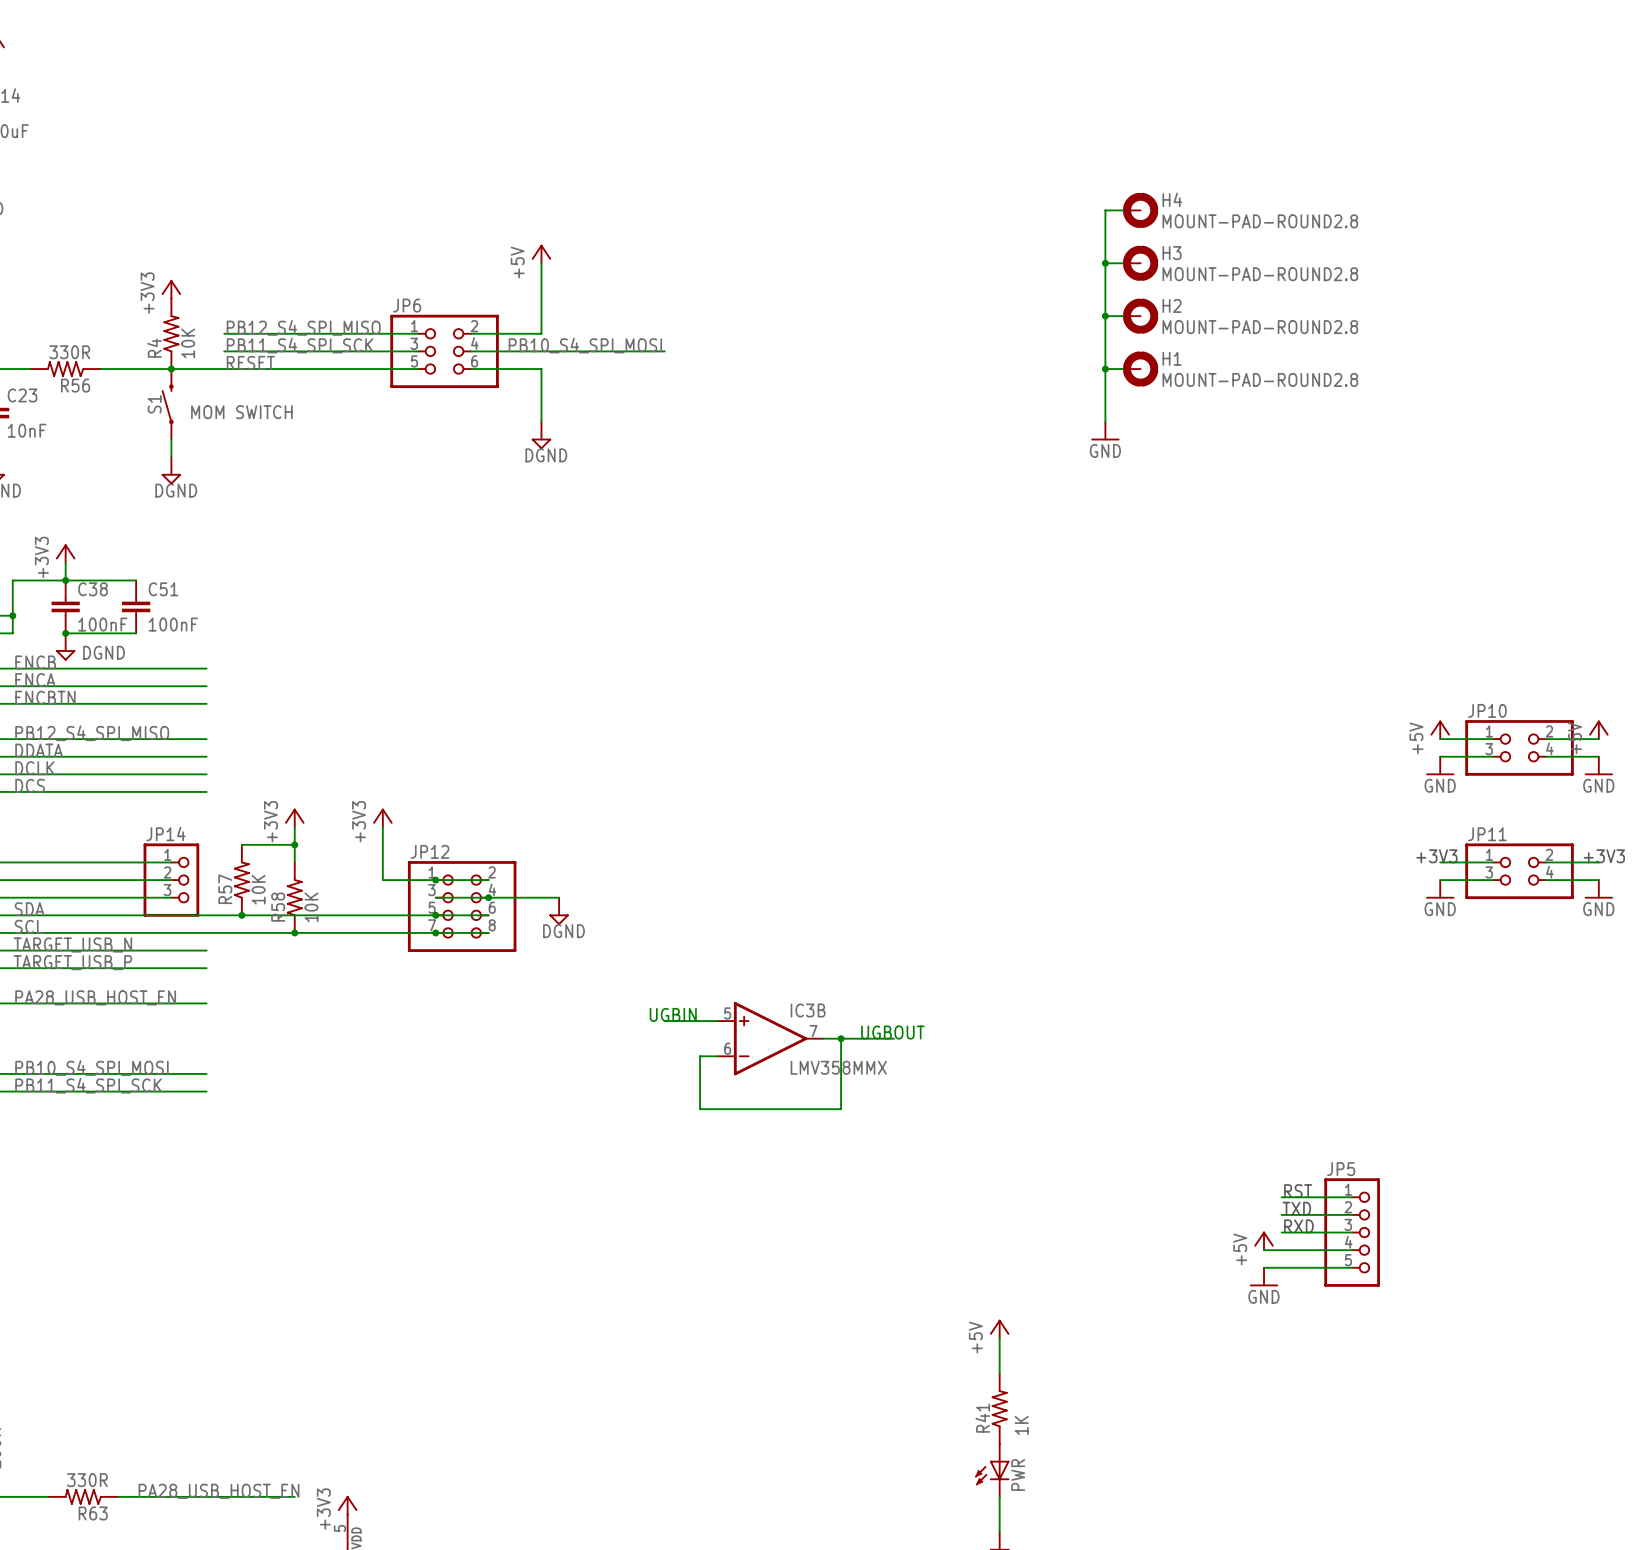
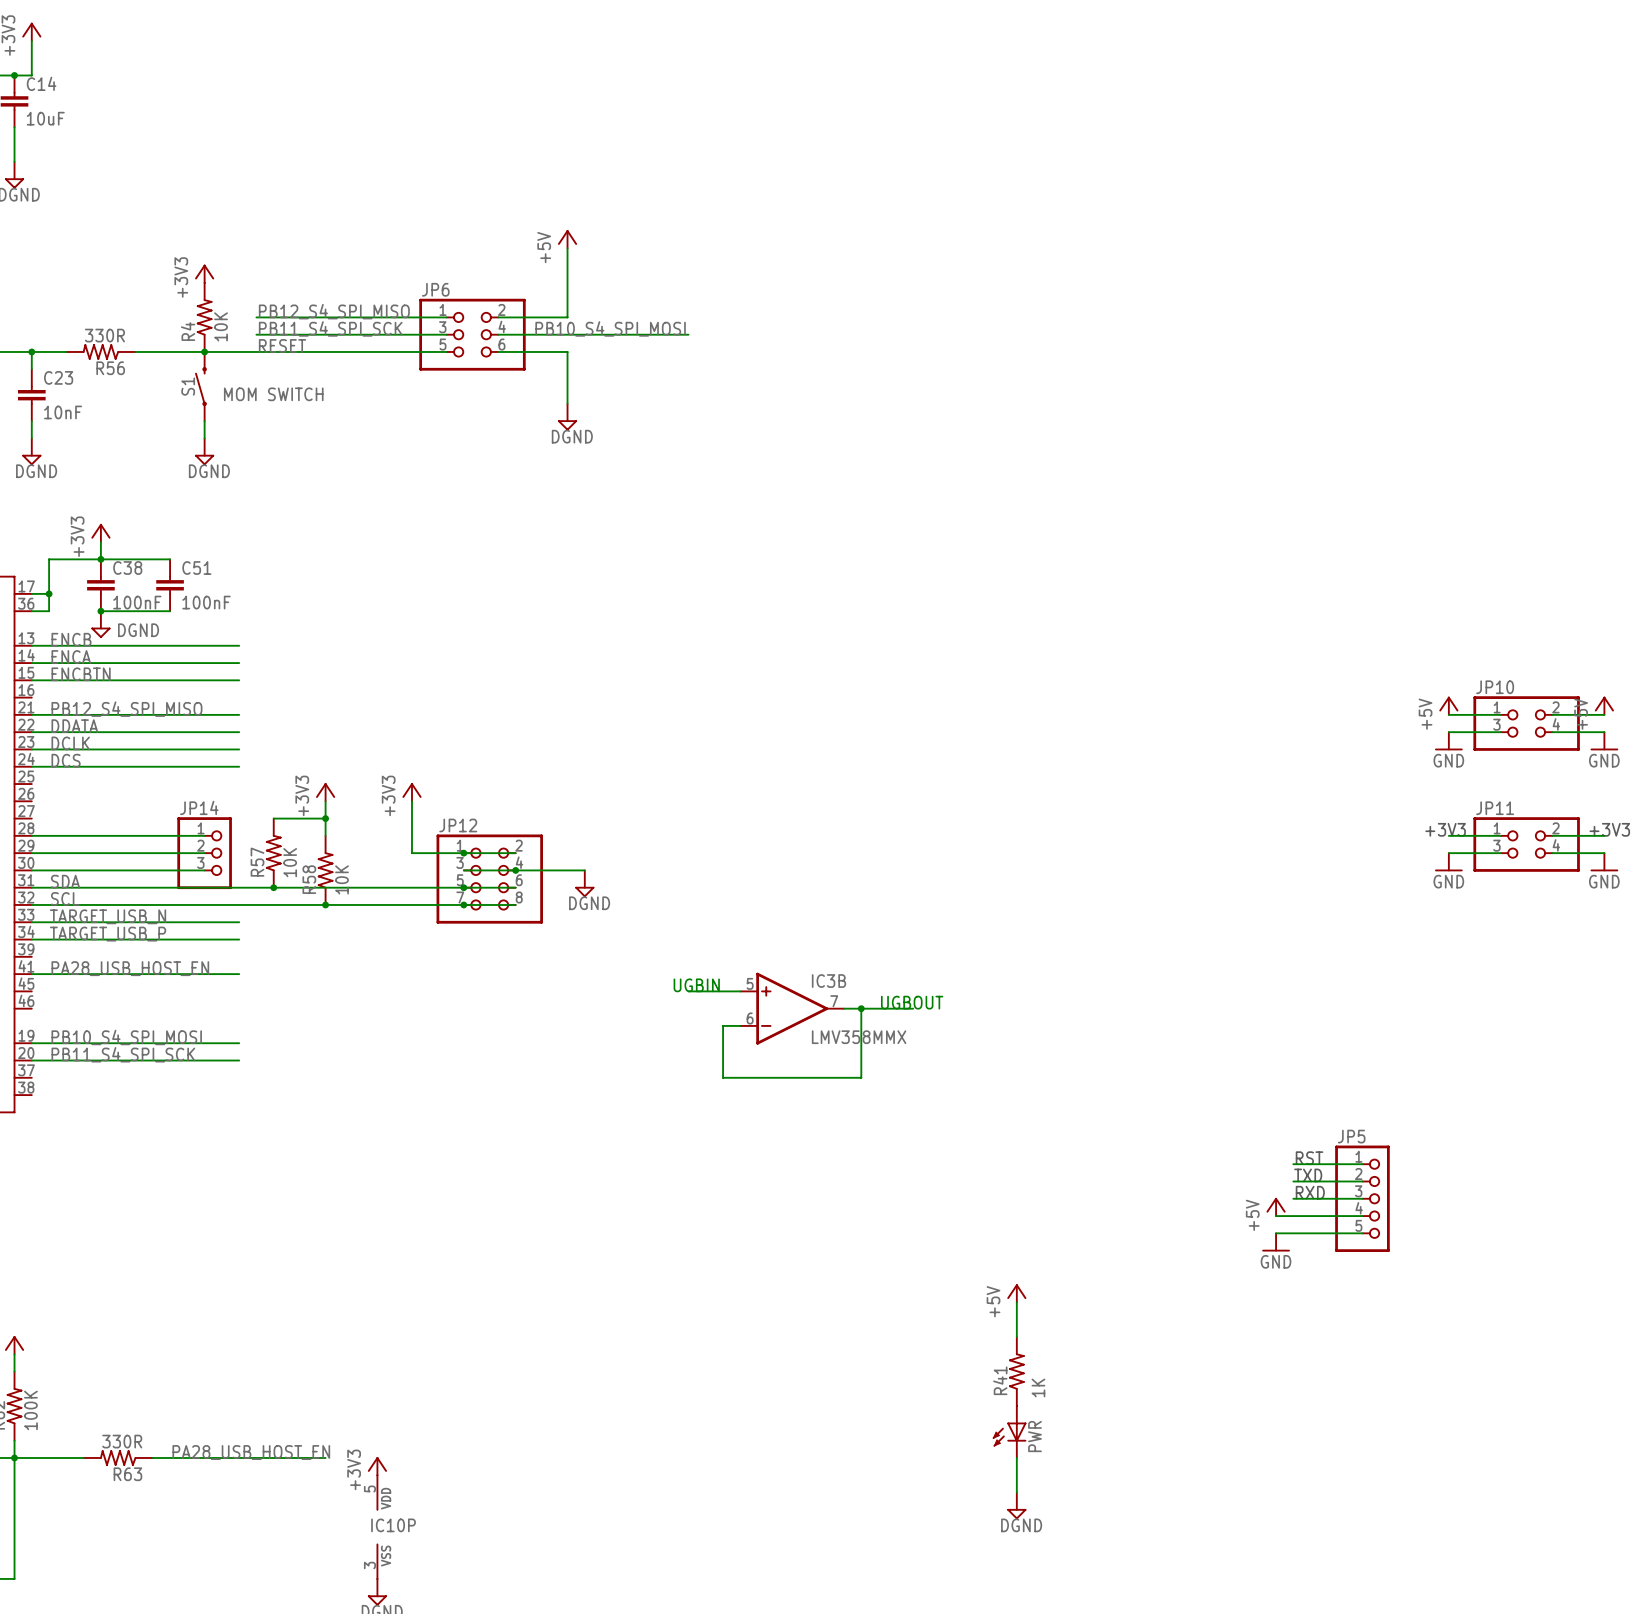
wire: (1123, 210) (1105, 210) (1105, 421) -> none
H4: MOUNT-PAD-ROUND2.8 (1140, 210) -> none
wire: (1105, 263) (1123, 263) -> none
junction: (1105, 263) -> none
H3: MOUNT-PAD-ROUND2.8 (1140, 263) -> none
wire: (1105, 316) (1123, 316) -> none
junction: (1105, 316) -> none
H2: MOUNT-PAD-ROUND2.8 (1140, 316) -> none
wire: (1105, 369) (1123, 369) -> none
junction: (1105, 369) -> none
H1: MOUNT-PAD-ROUND2.8 (1140, 369) -> none
power symbol: GND (1105, 431) -> none

